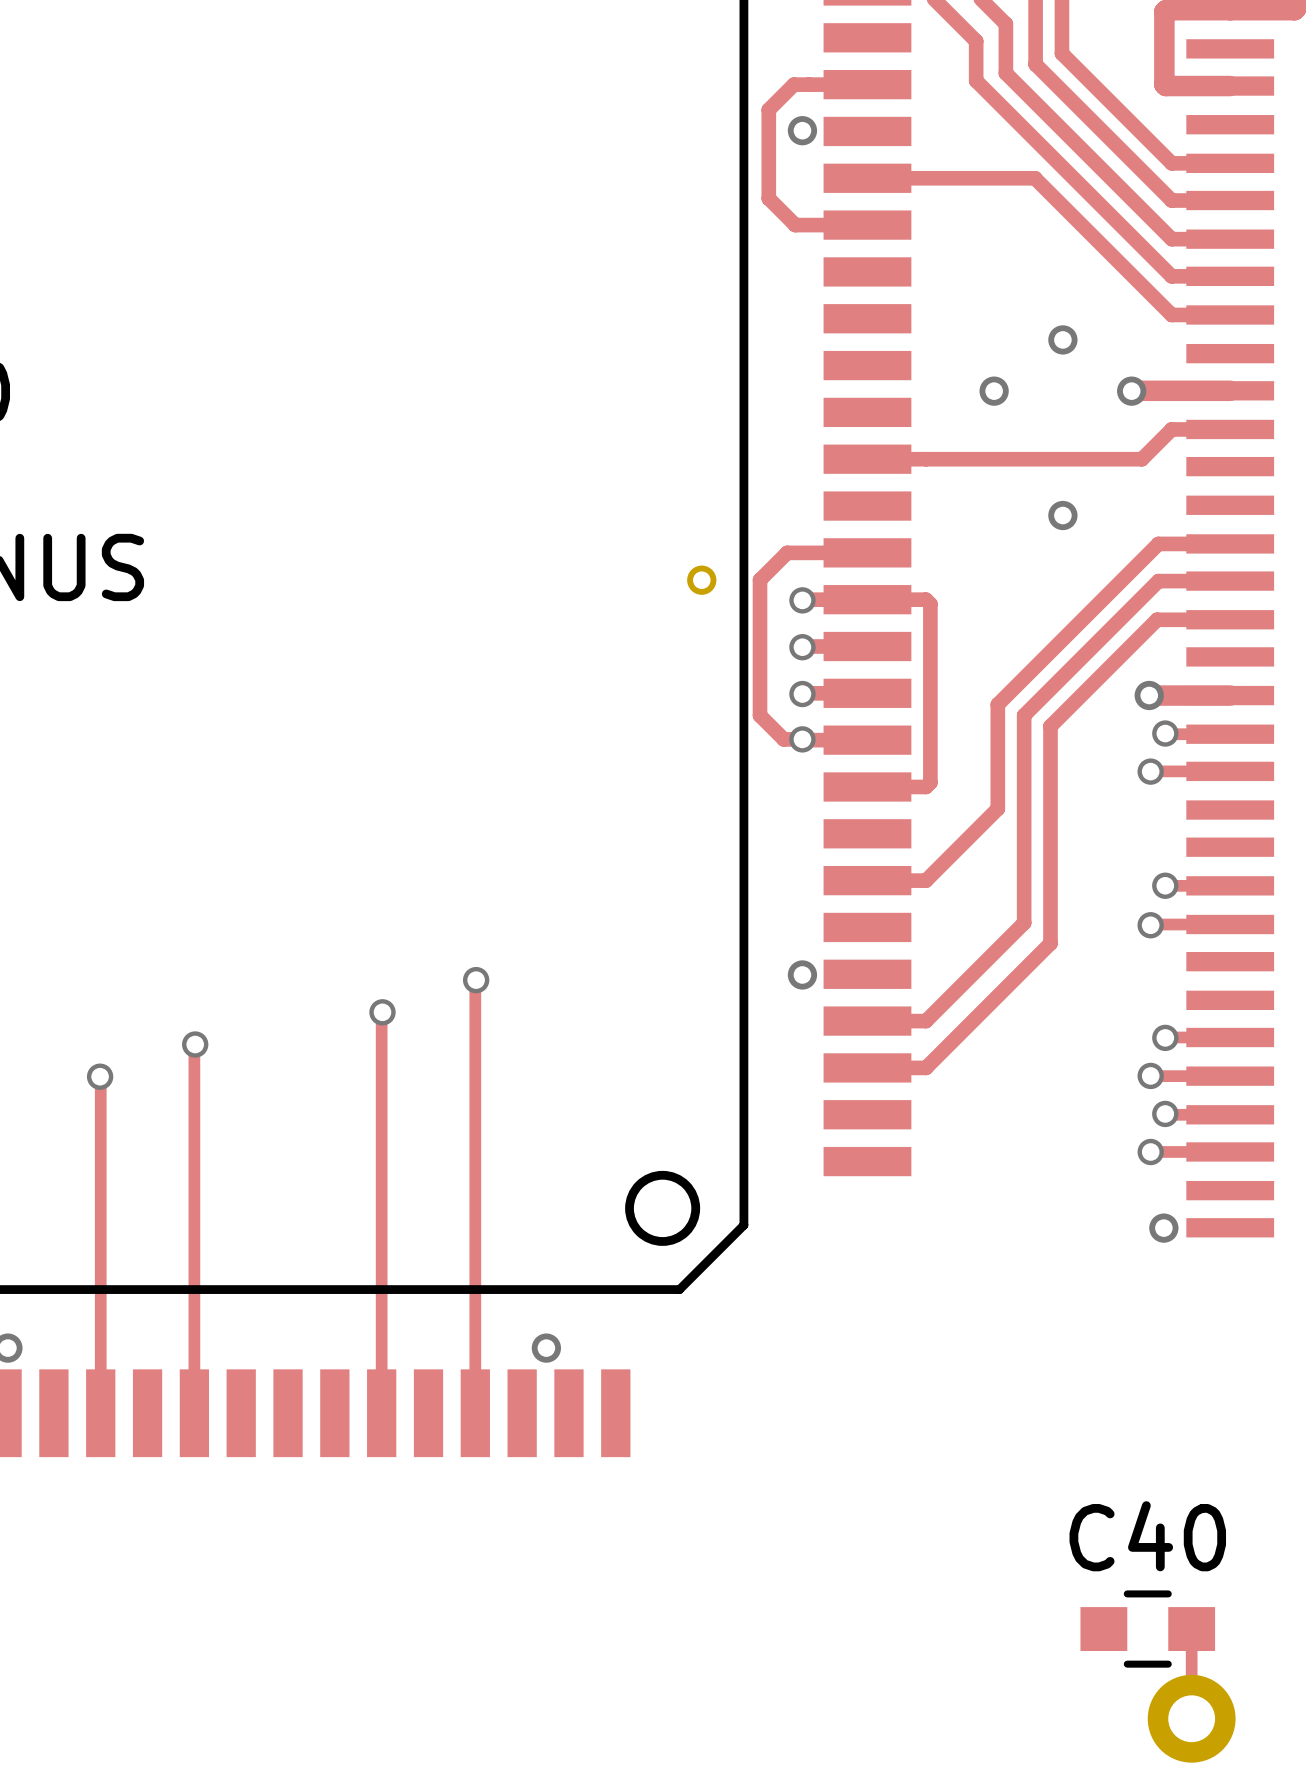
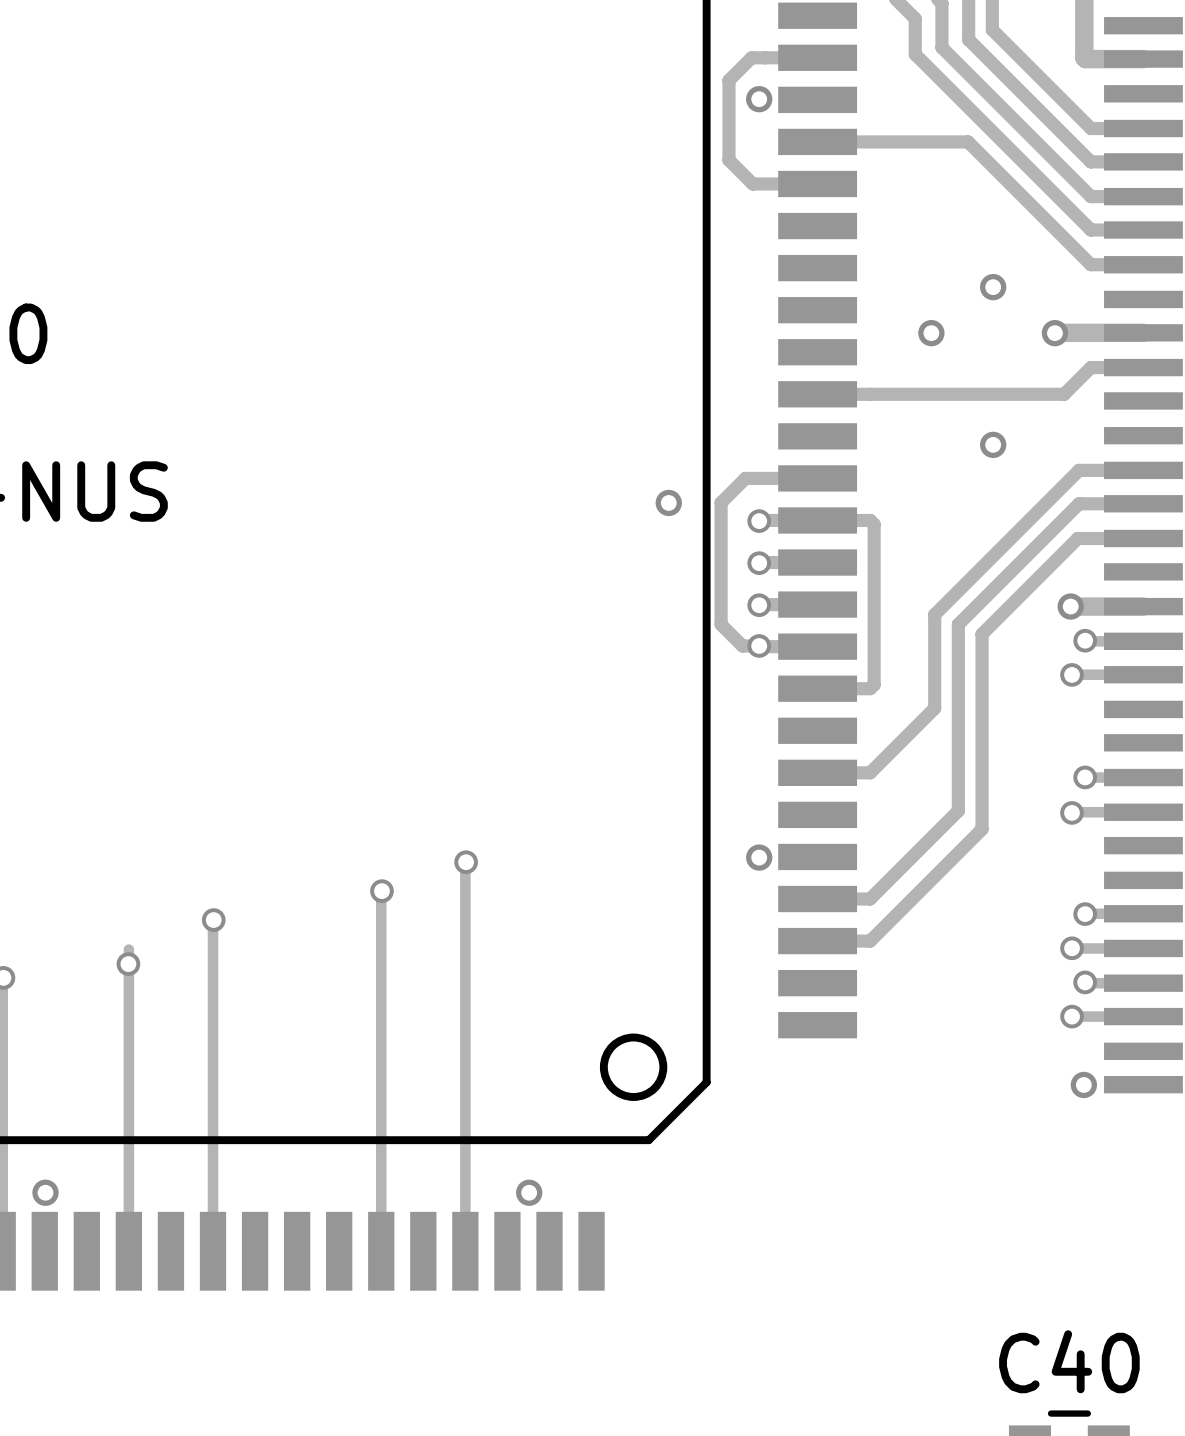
via position: (100, 1076) -> (128, 964)

